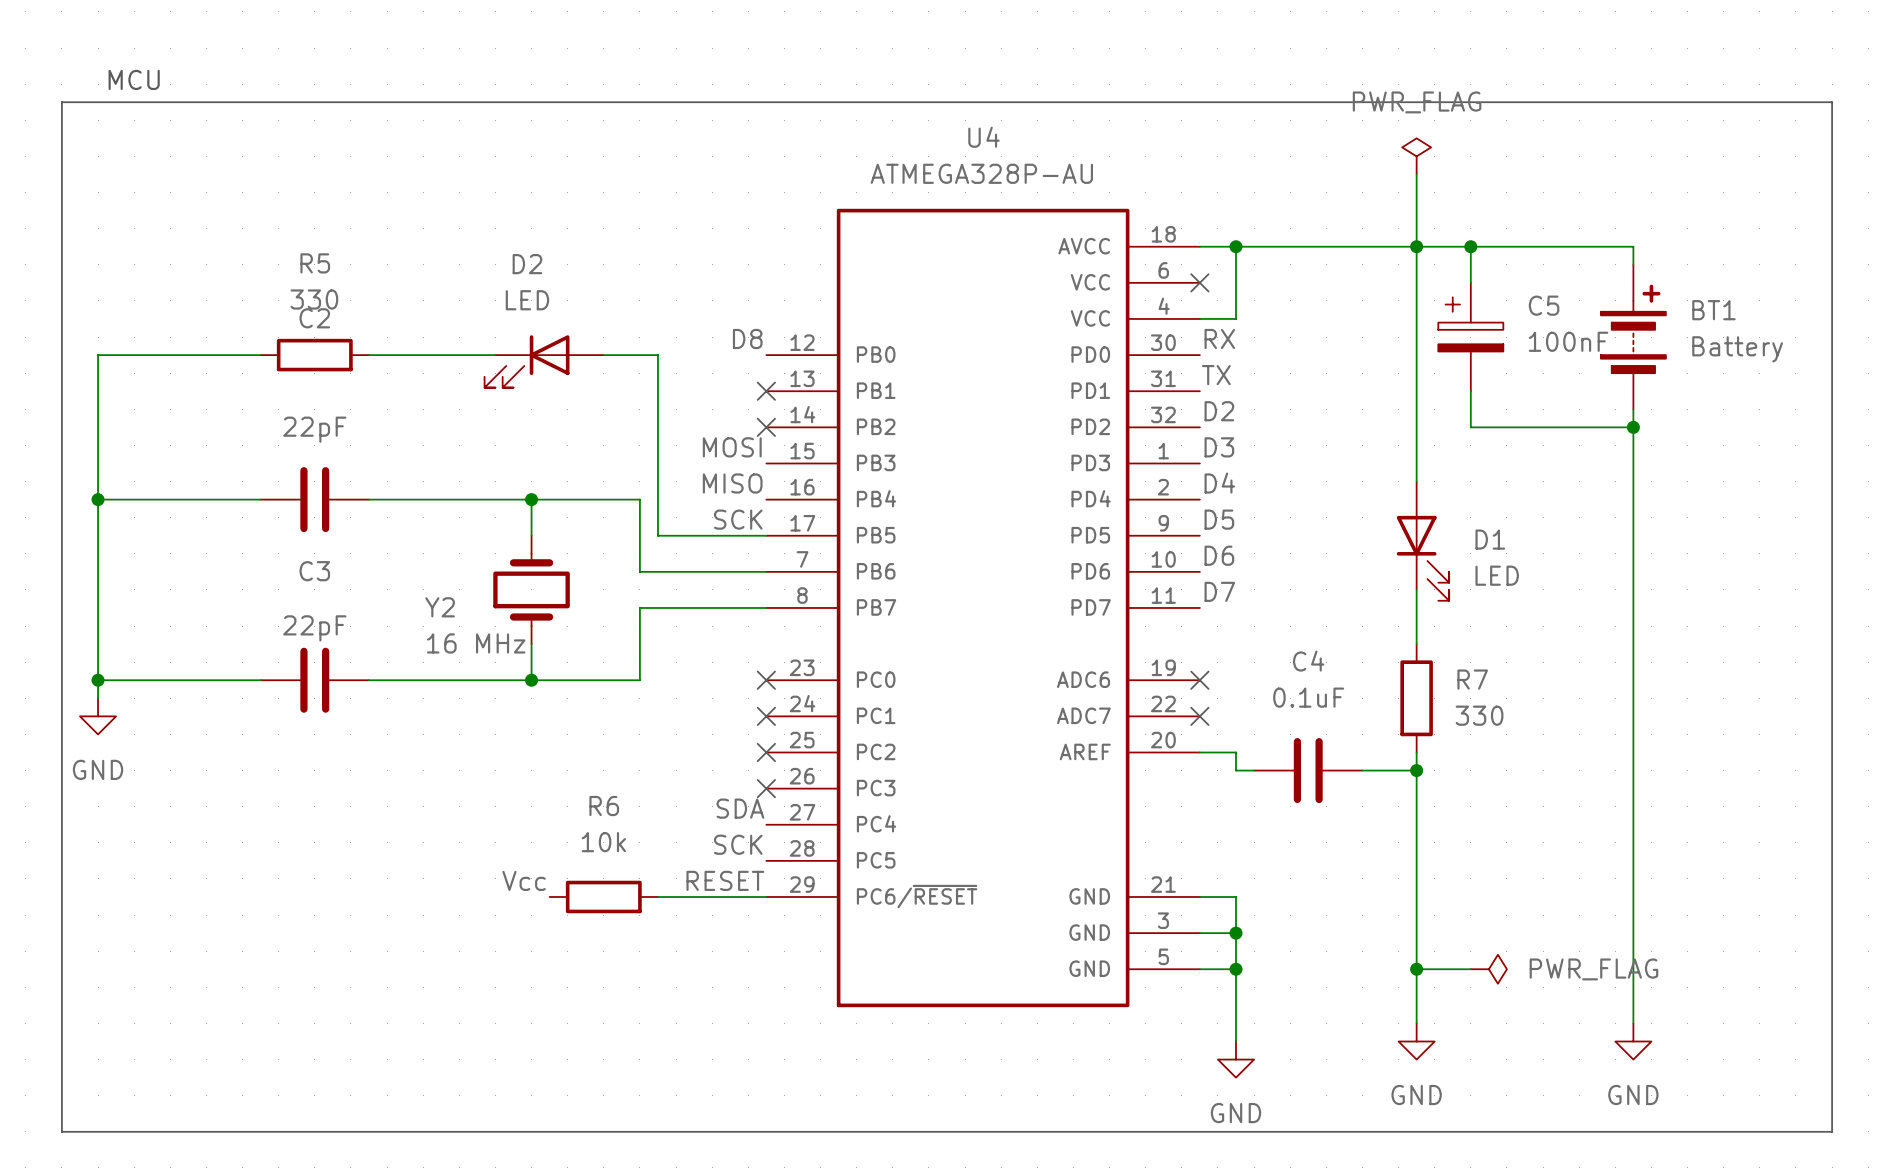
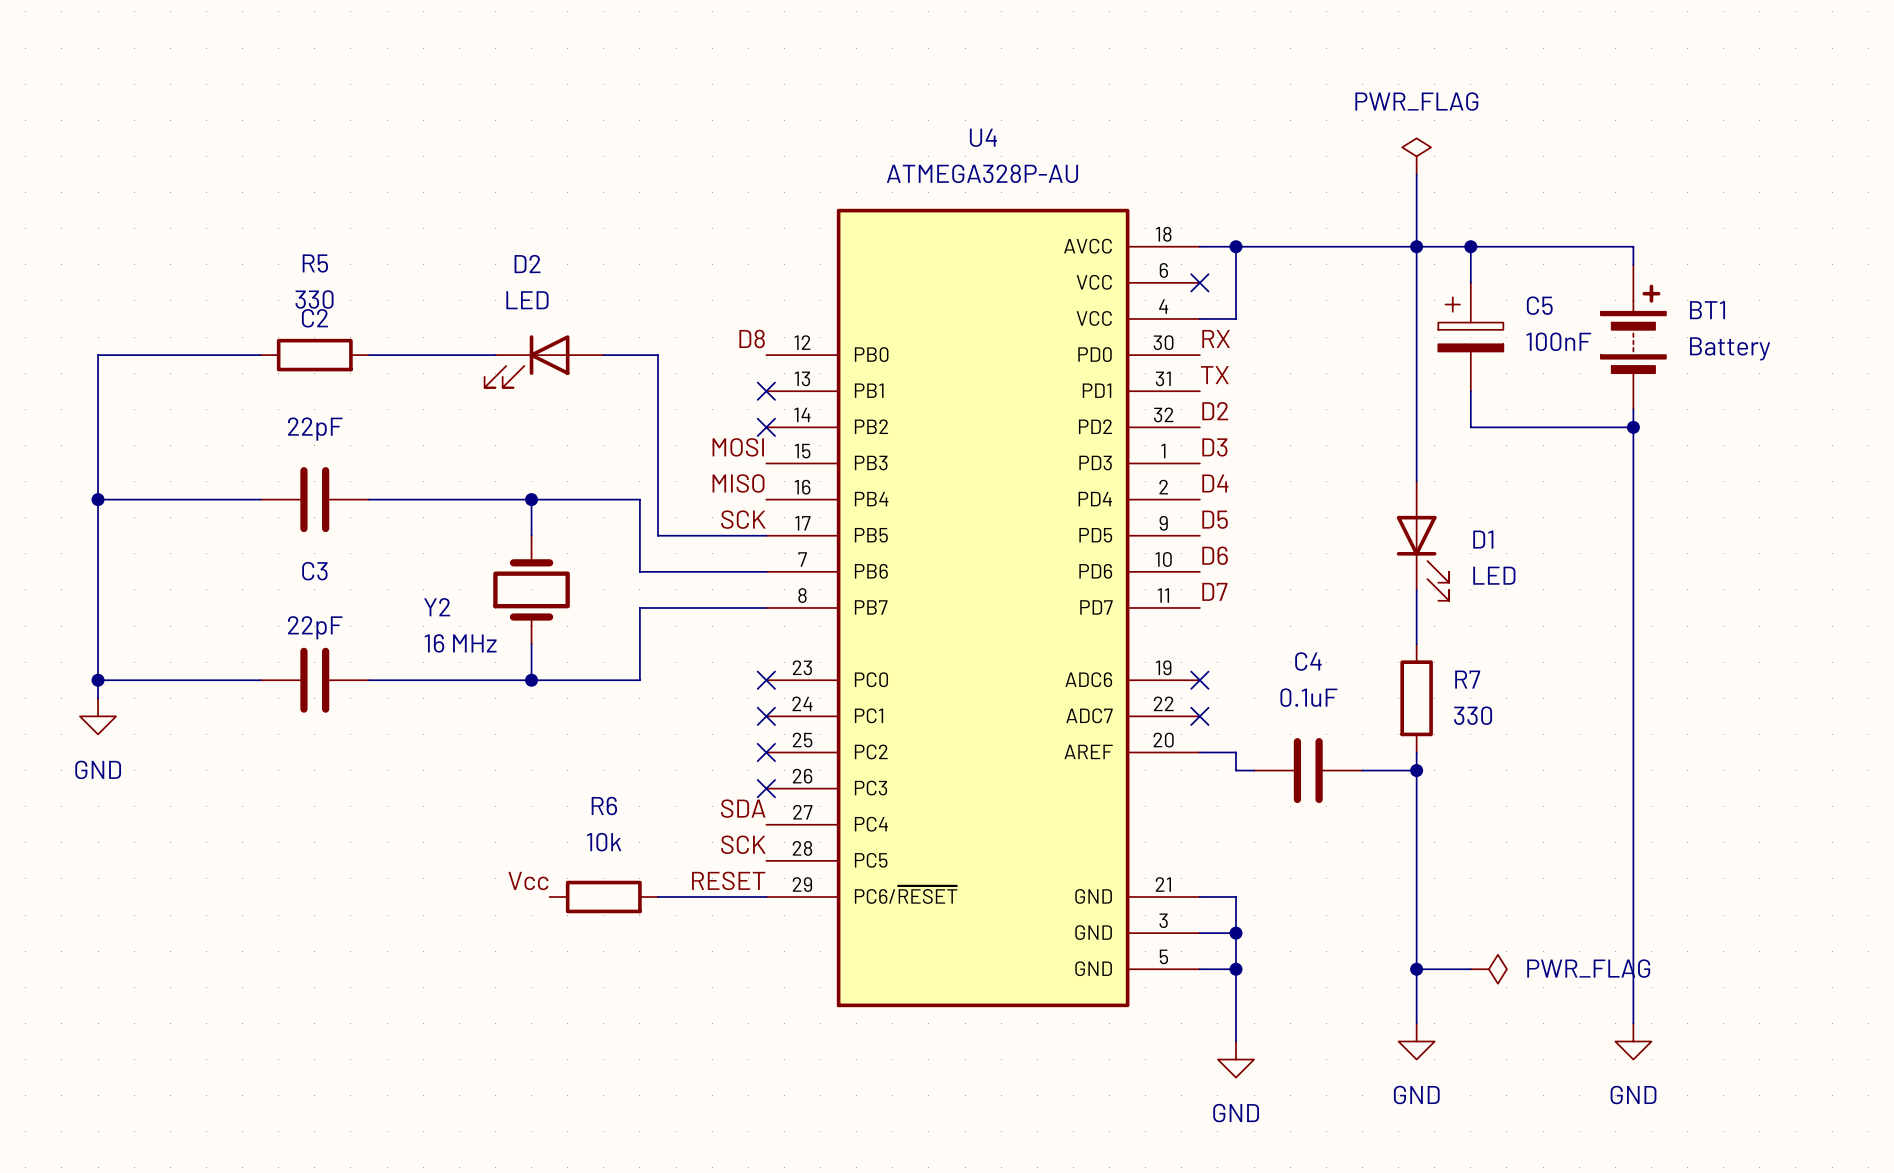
text: MCU (134, 79) -> none
line: (61, 102) (1832, 102) (1832, 1131) (61, 1131) (61, 102) -> none

